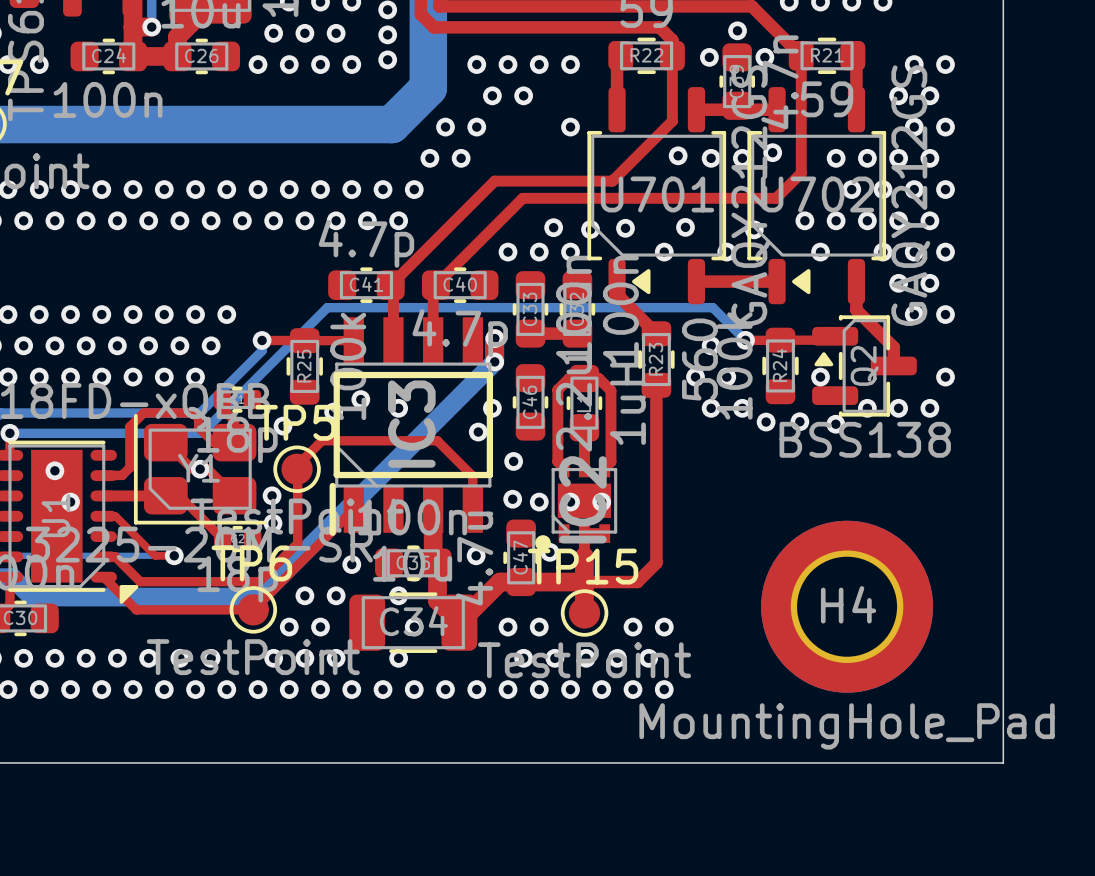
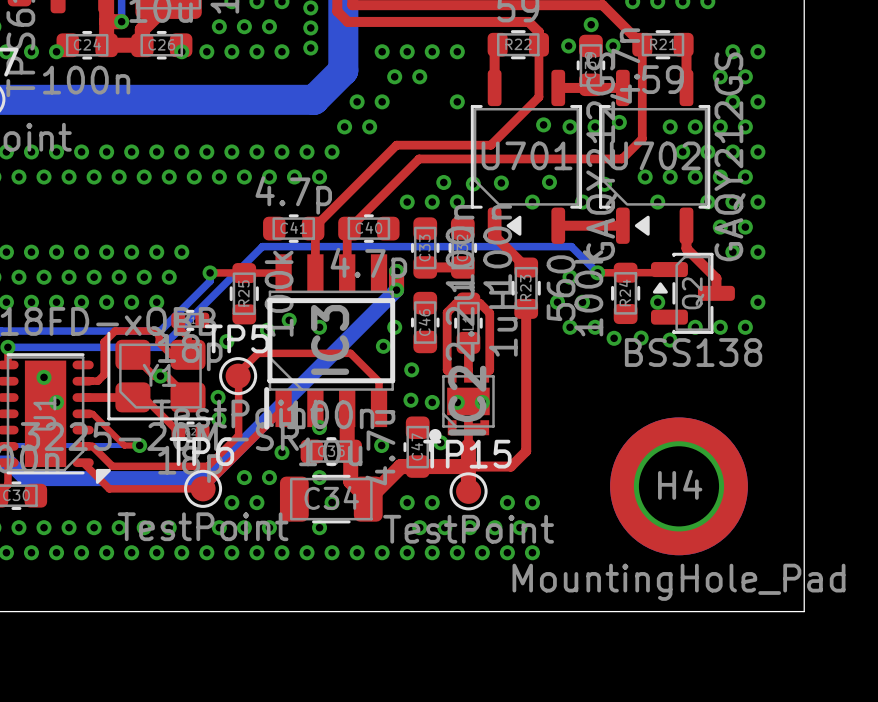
via: none -> (56, 51)
via: none -> (181, 51)
via: none -> (319, 427)

